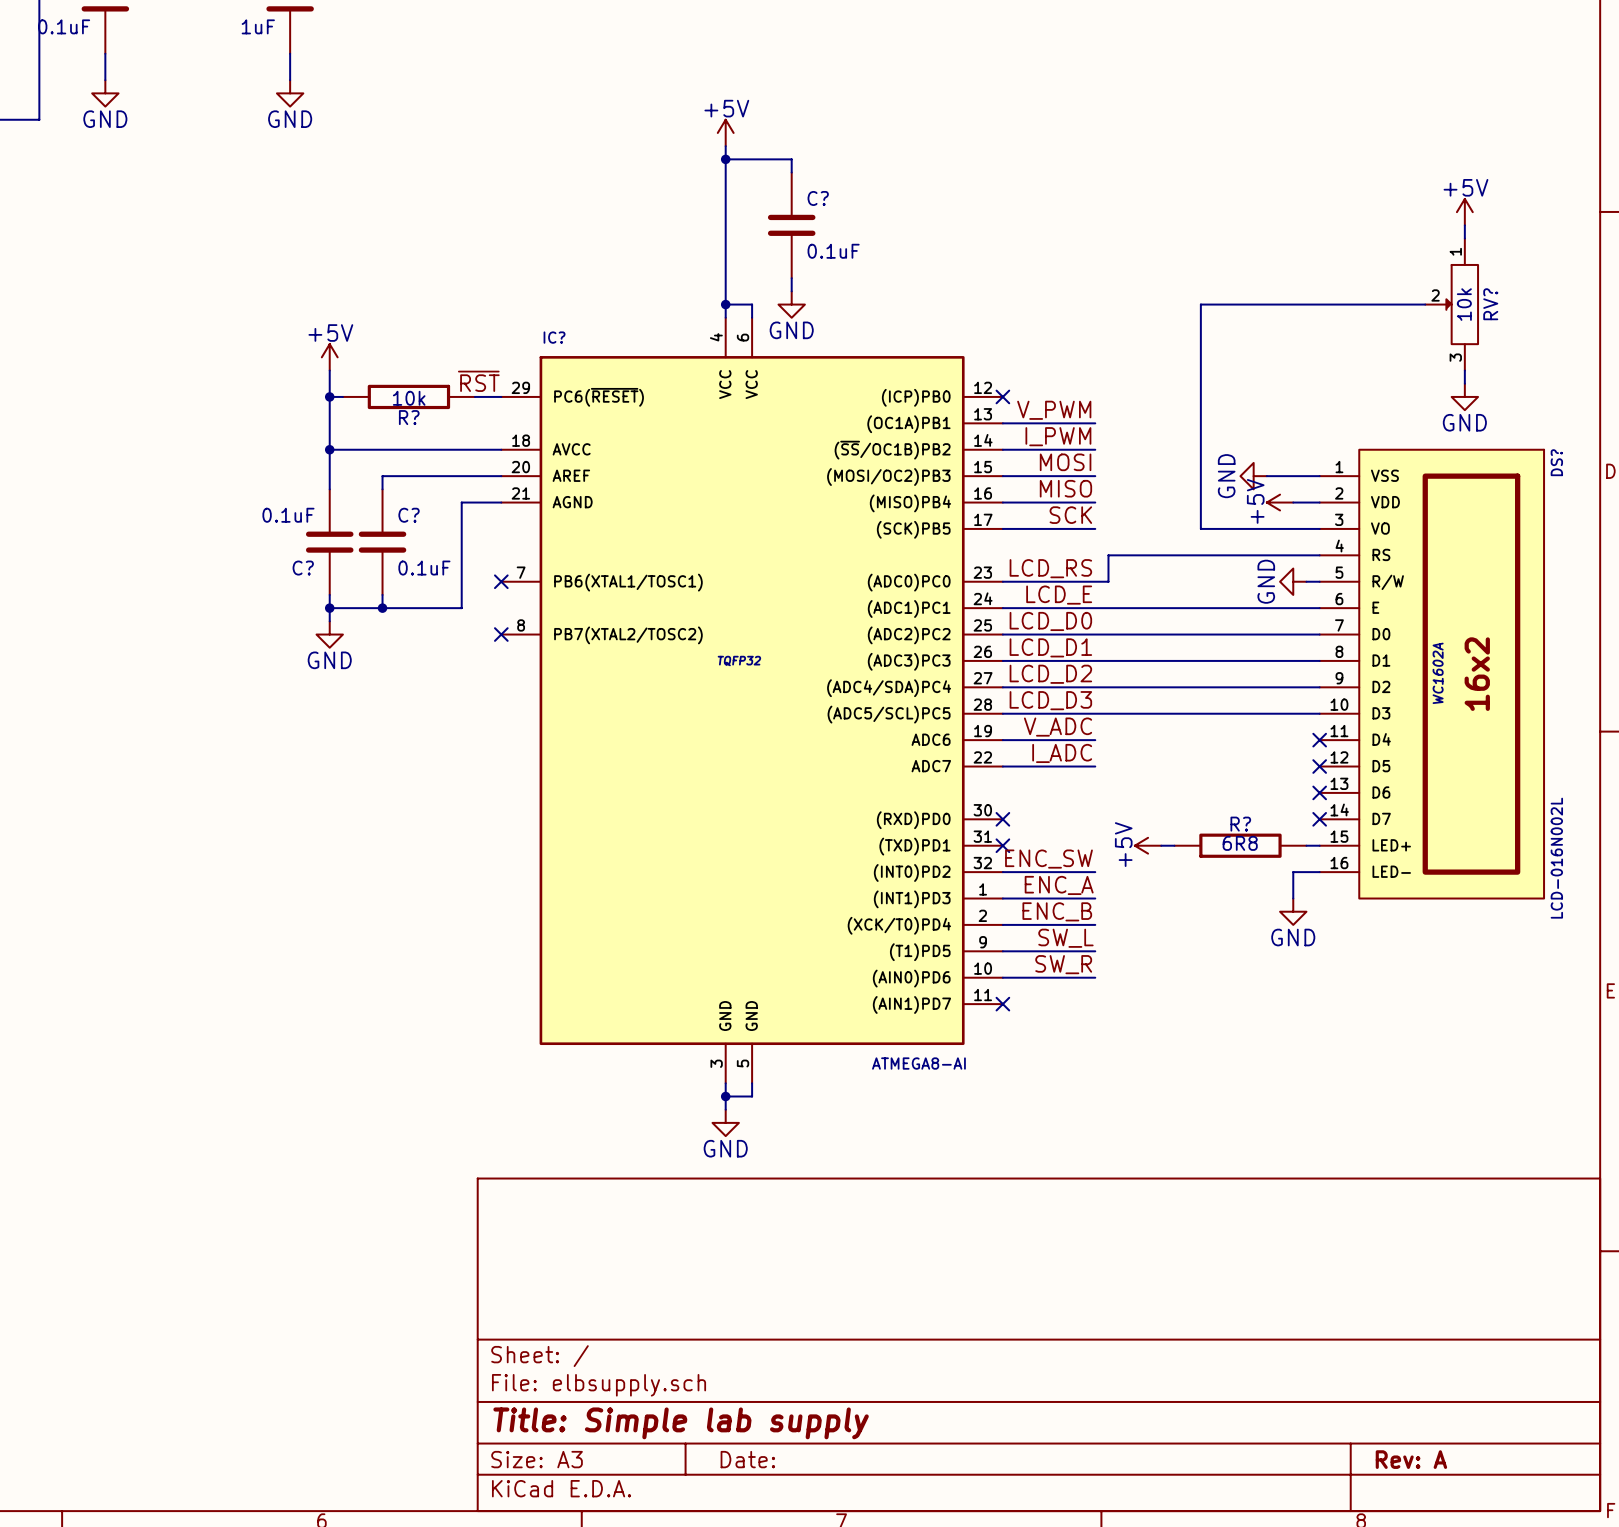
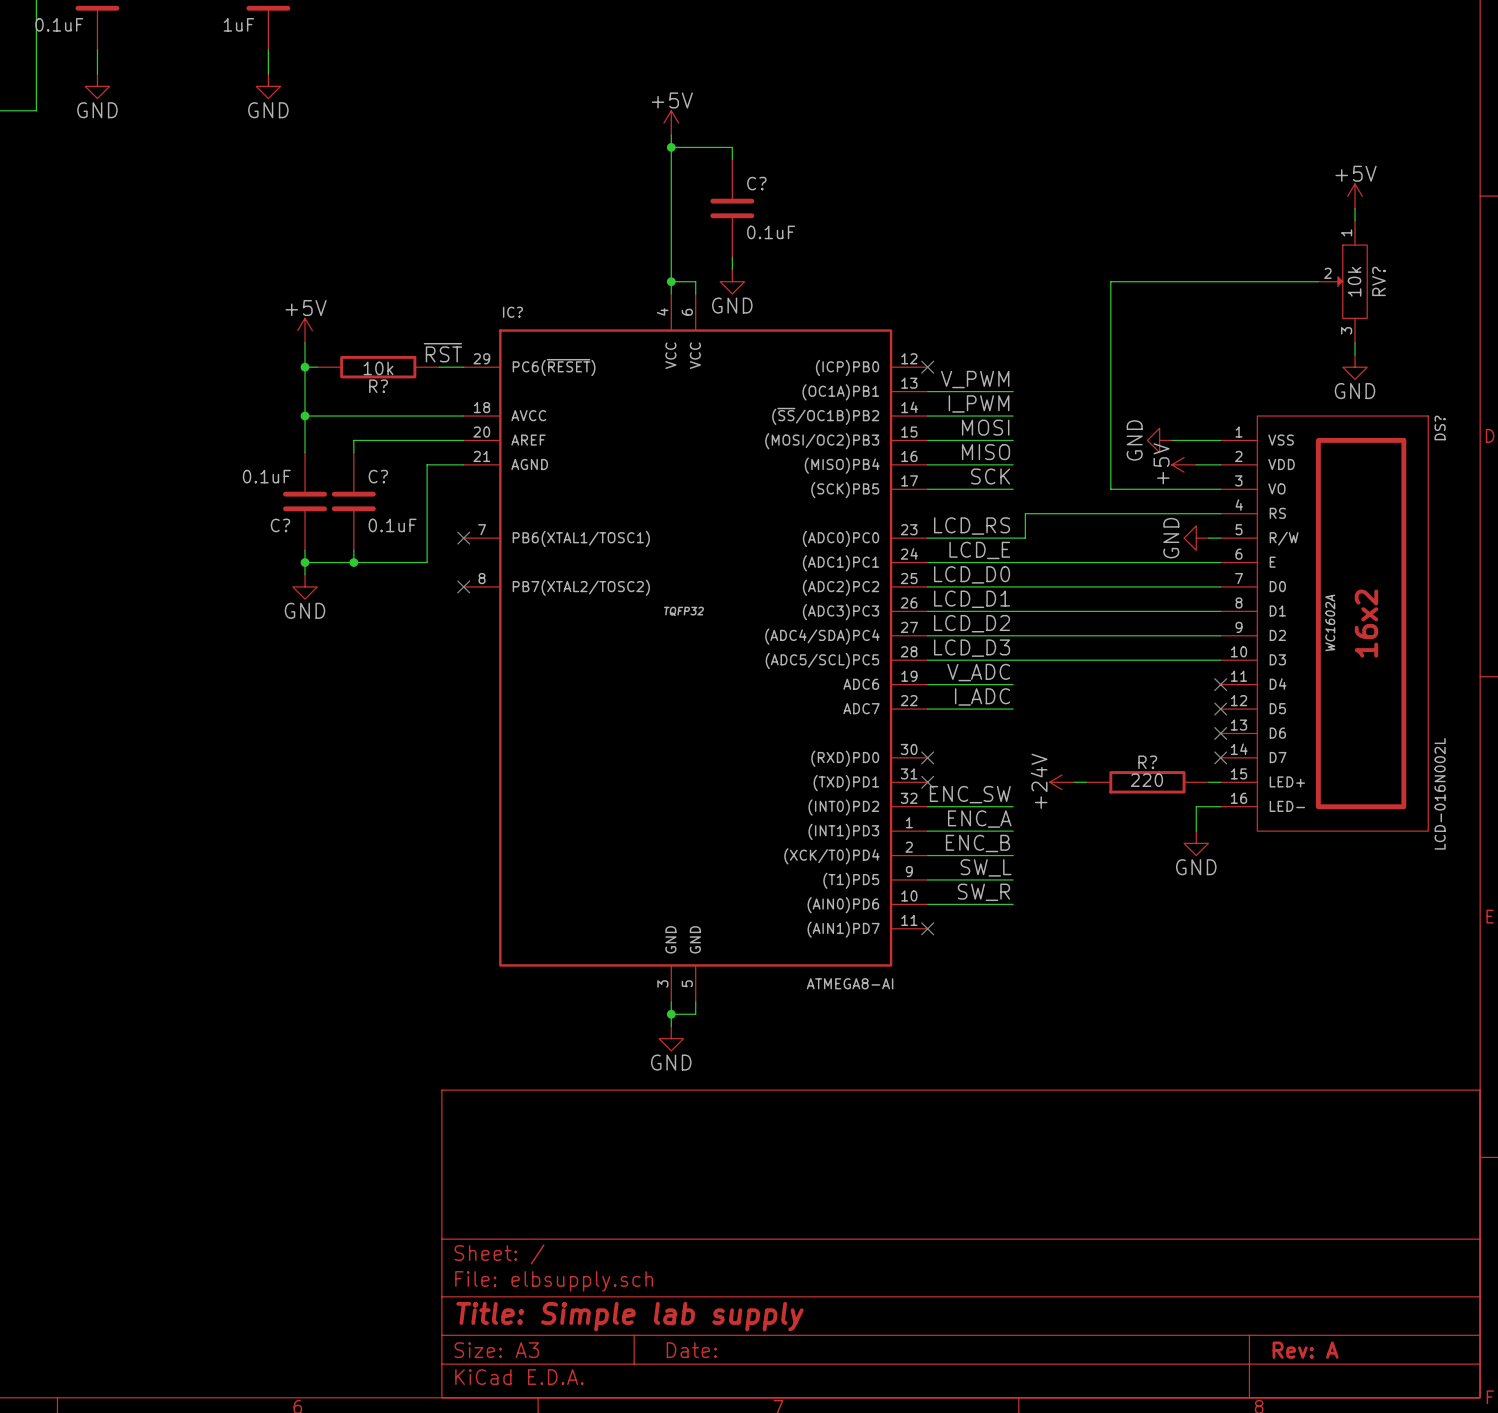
R? value: 6R8 (1240, 843) -> 220 (1146, 780)
power symbol: +5V (1148, 845) -> +24V (1061, 782)

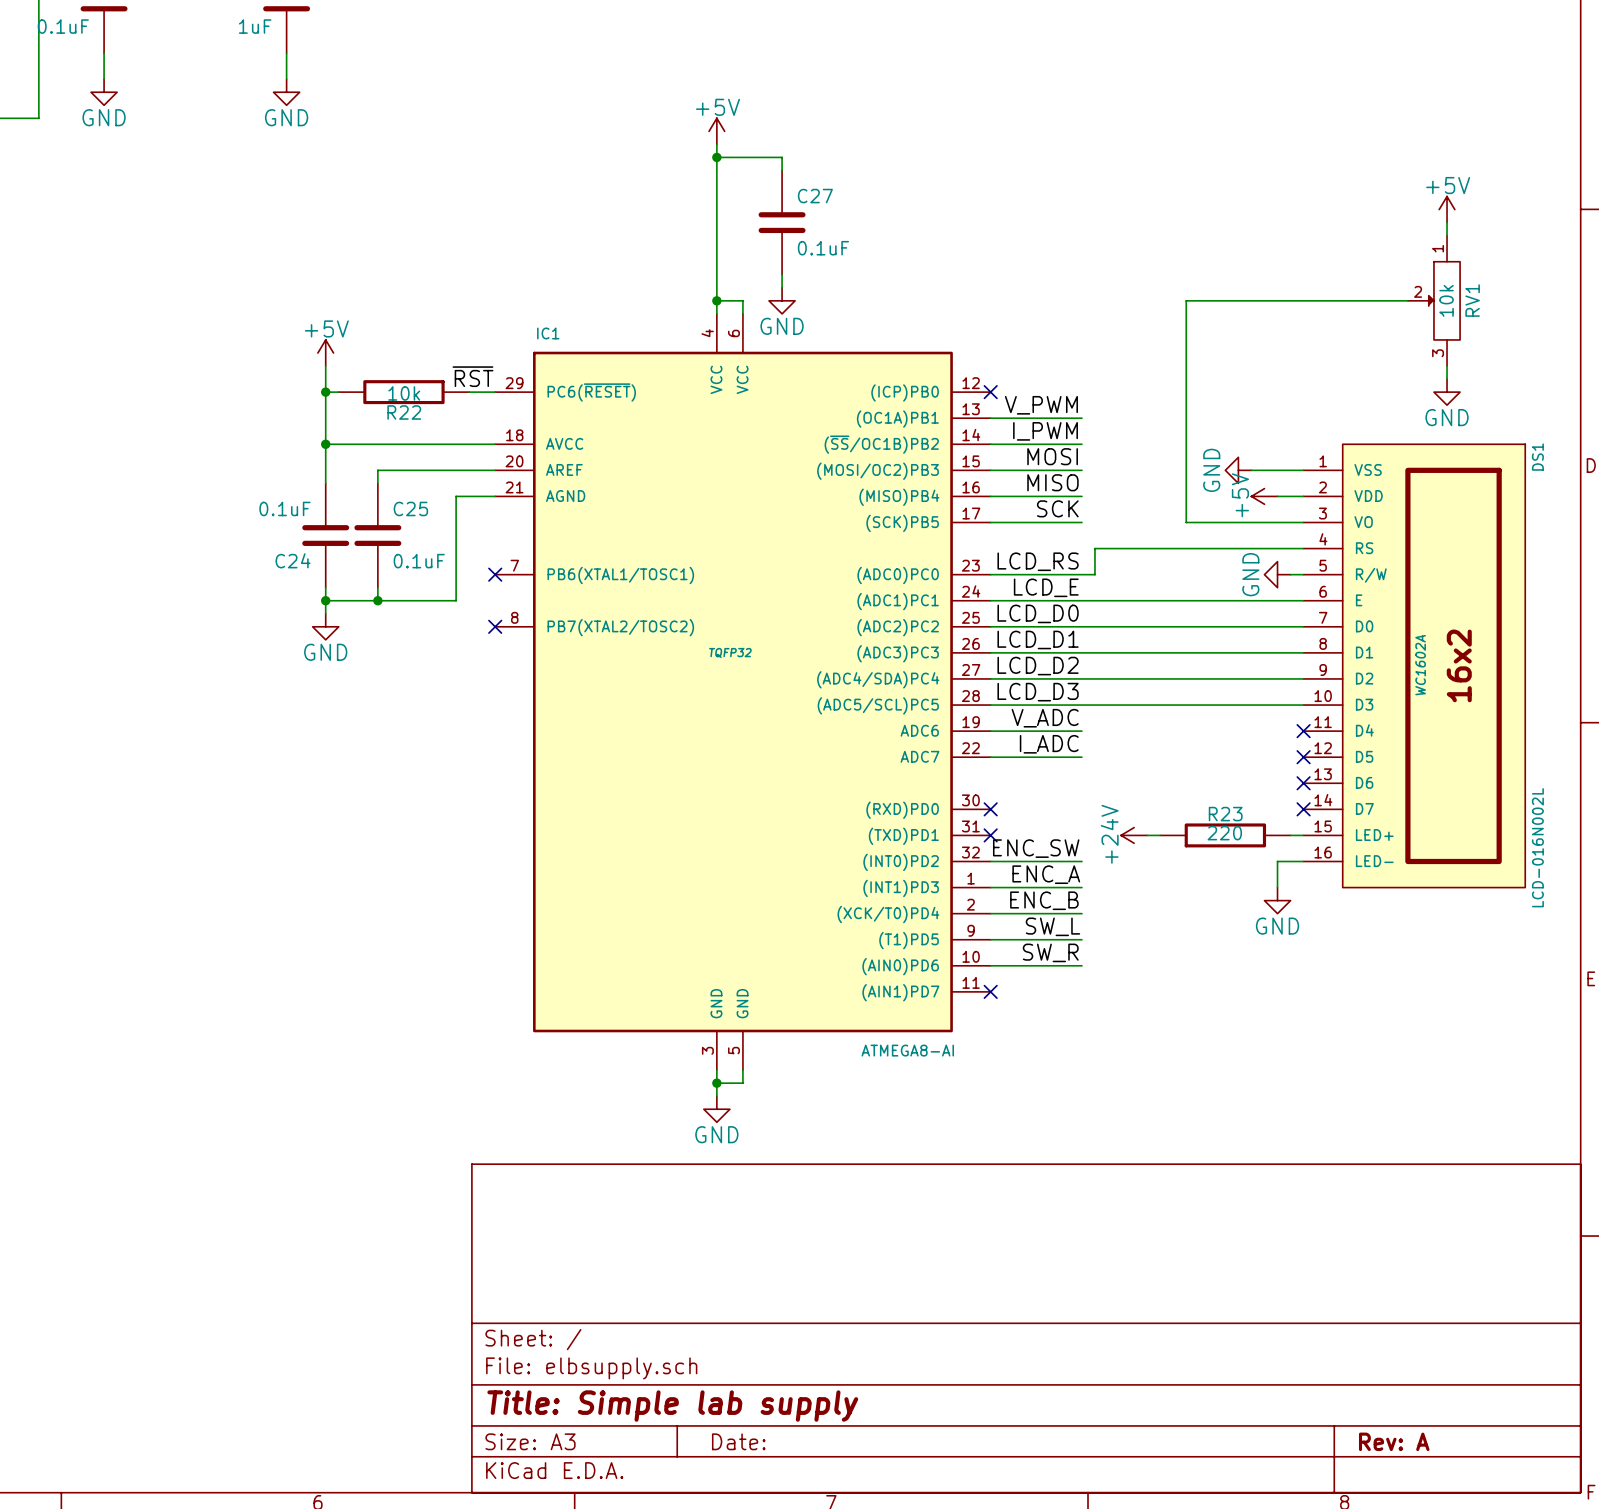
C? name: C? (756, 183) -> C27 (815, 196)
RV? name: RV? (1378, 281) -> RV1 (1472, 300)
IC? name: IC? (512, 312) -> IC1 (548, 333)
R? name: R? (378, 386) -> R22 (404, 412)
DS? name: DS? (1440, 427) -> DS1 (1537, 457)
C? name: C? (378, 476) -> C25 (410, 508)
C? name: C? (280, 525) -> C24 (293, 560)
R? name: R? (1147, 762) -> R23 (1225, 814)

